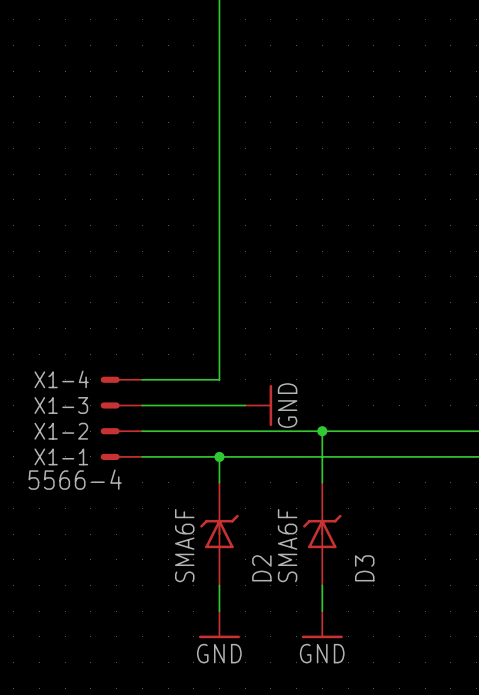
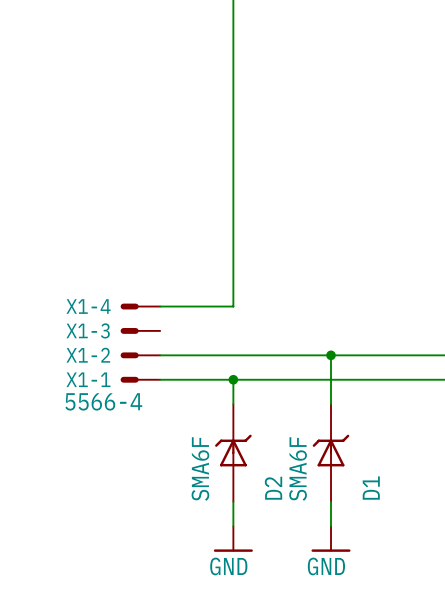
wire: (142, 405) (245, 405) -> none
power symbol: GND (258, 405) -> none
D3 name: D3 (364, 568) -> D1 (371, 488)

